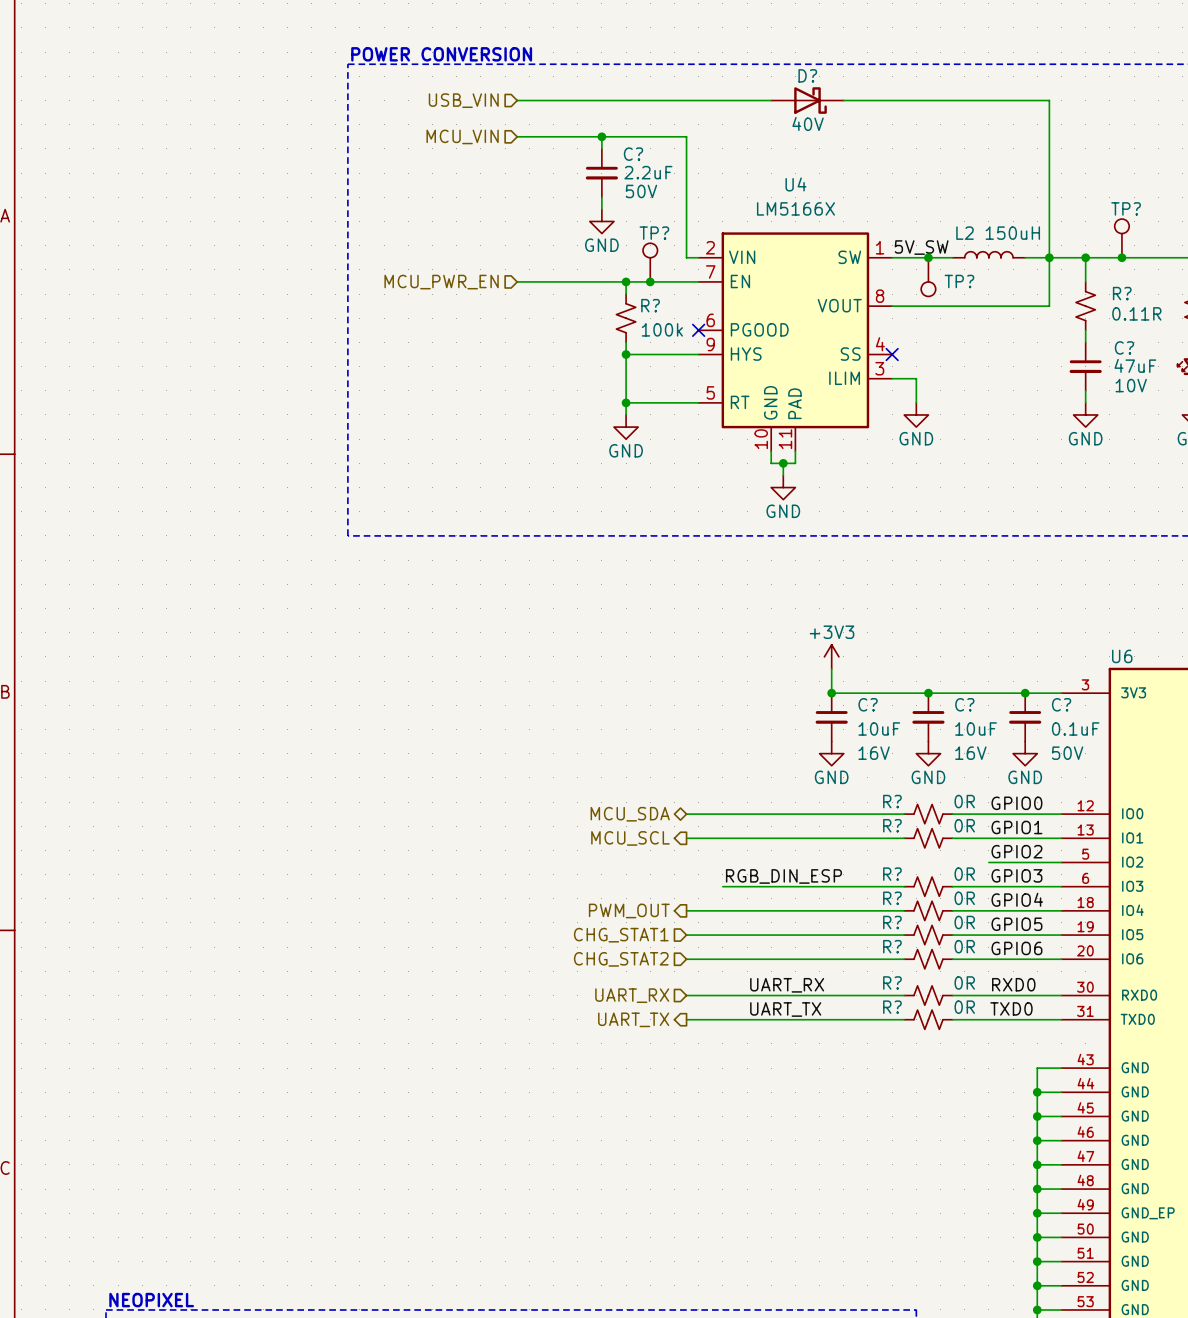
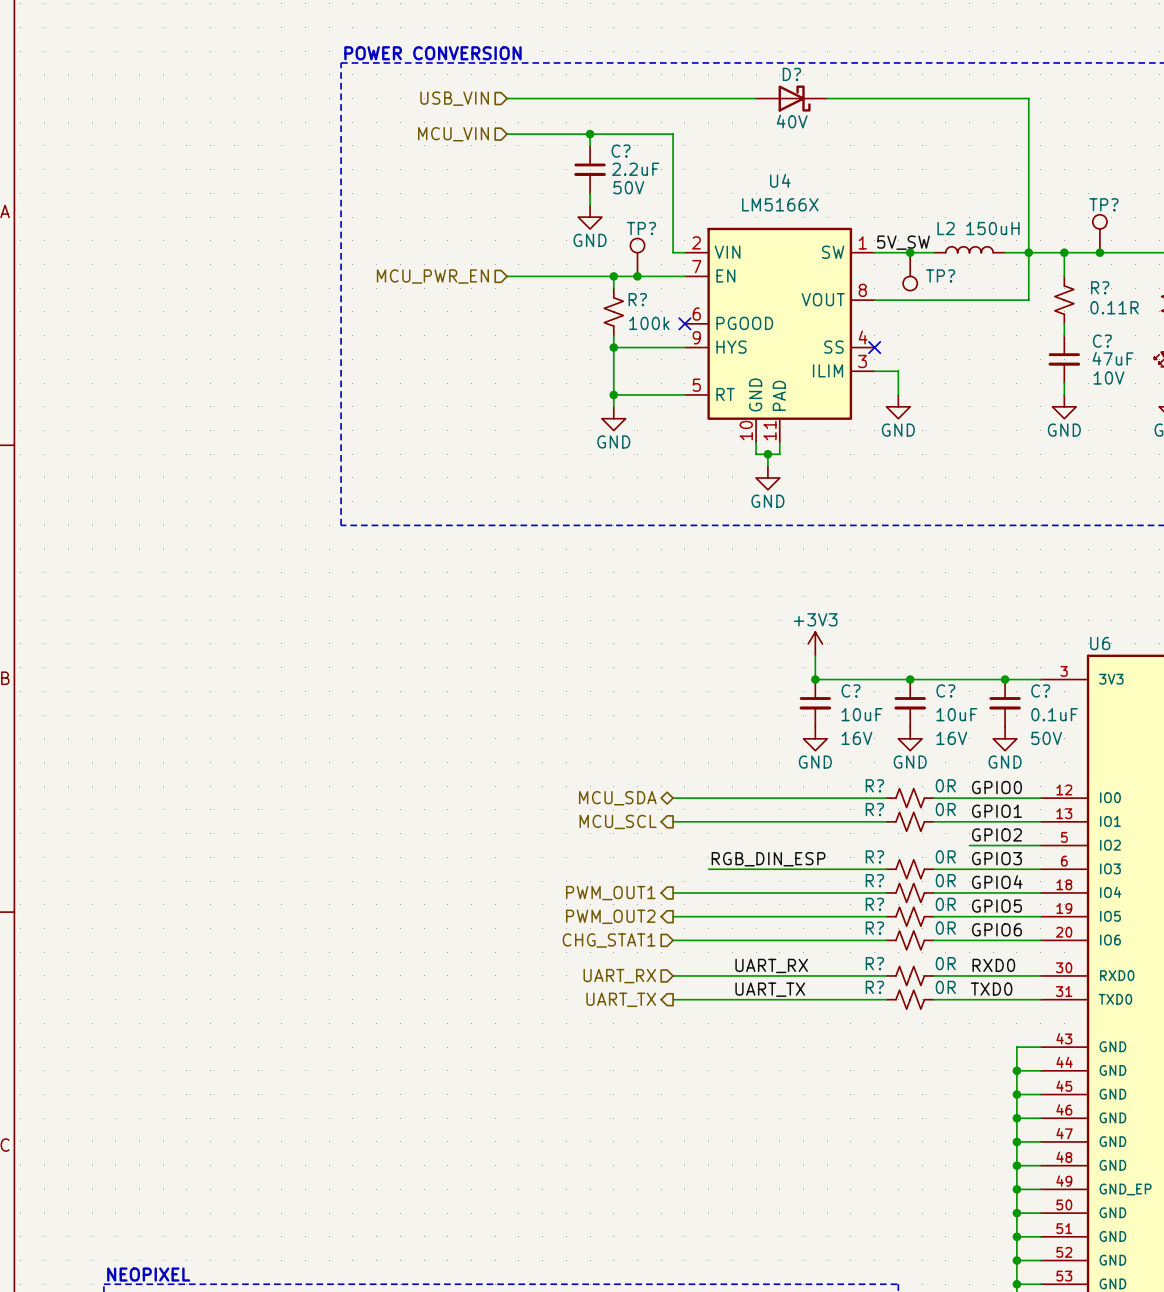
hierarchical label: PWM_OUT (629, 910) -> PWM_OUT1 (610, 893)
hierarchical label shape: input (621, 935) -> output (610, 916)
hierarchical label: CHG_STAT1 (621, 935) -> PWM_OUT2 (610, 916)
hierarchical label: CHG_STAT2 (621, 959) -> CHG_STAT1 (609, 940)

